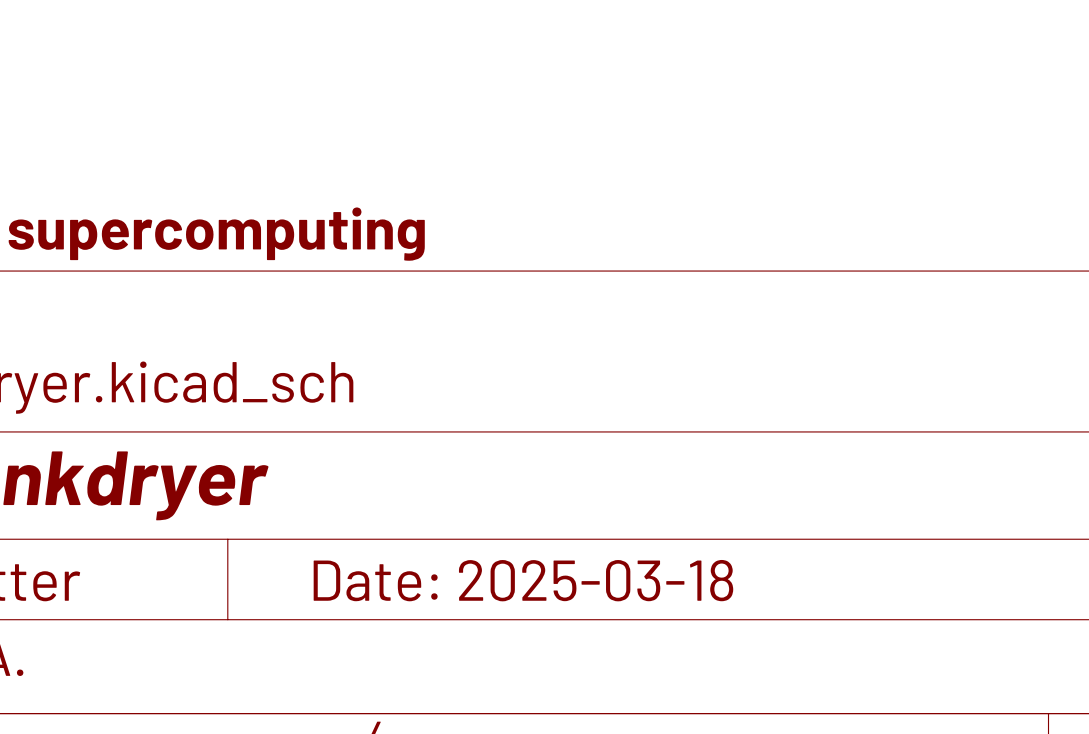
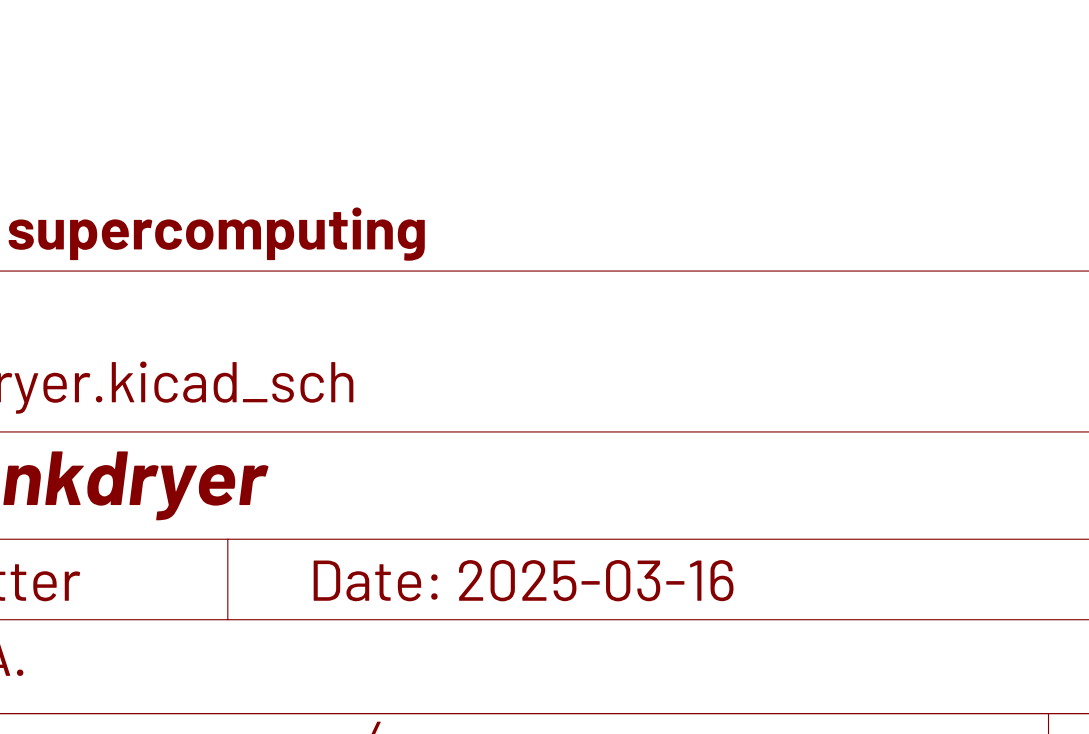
title block: Date: 2025-03-18 (523, 580) -> Date: 2025-03-16 (523, 580)

